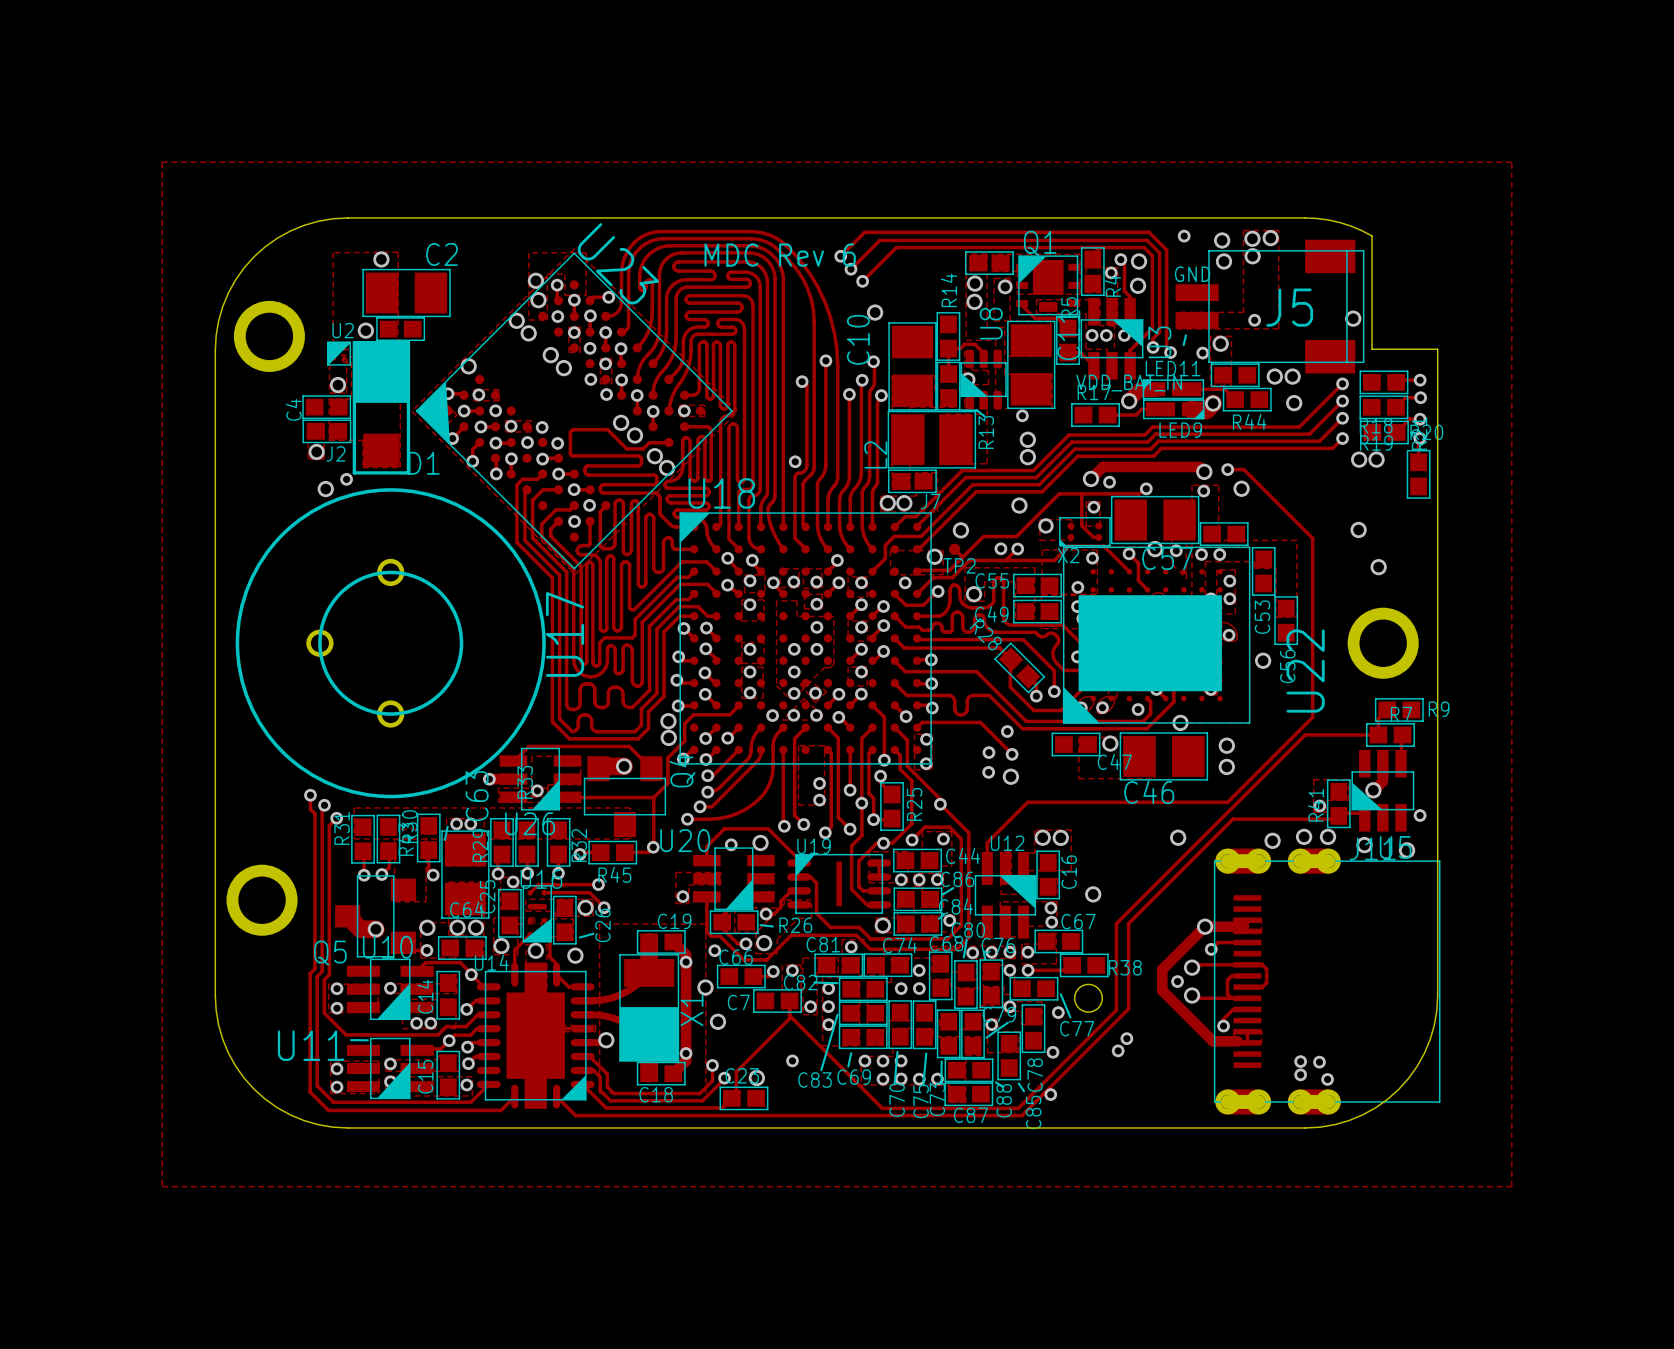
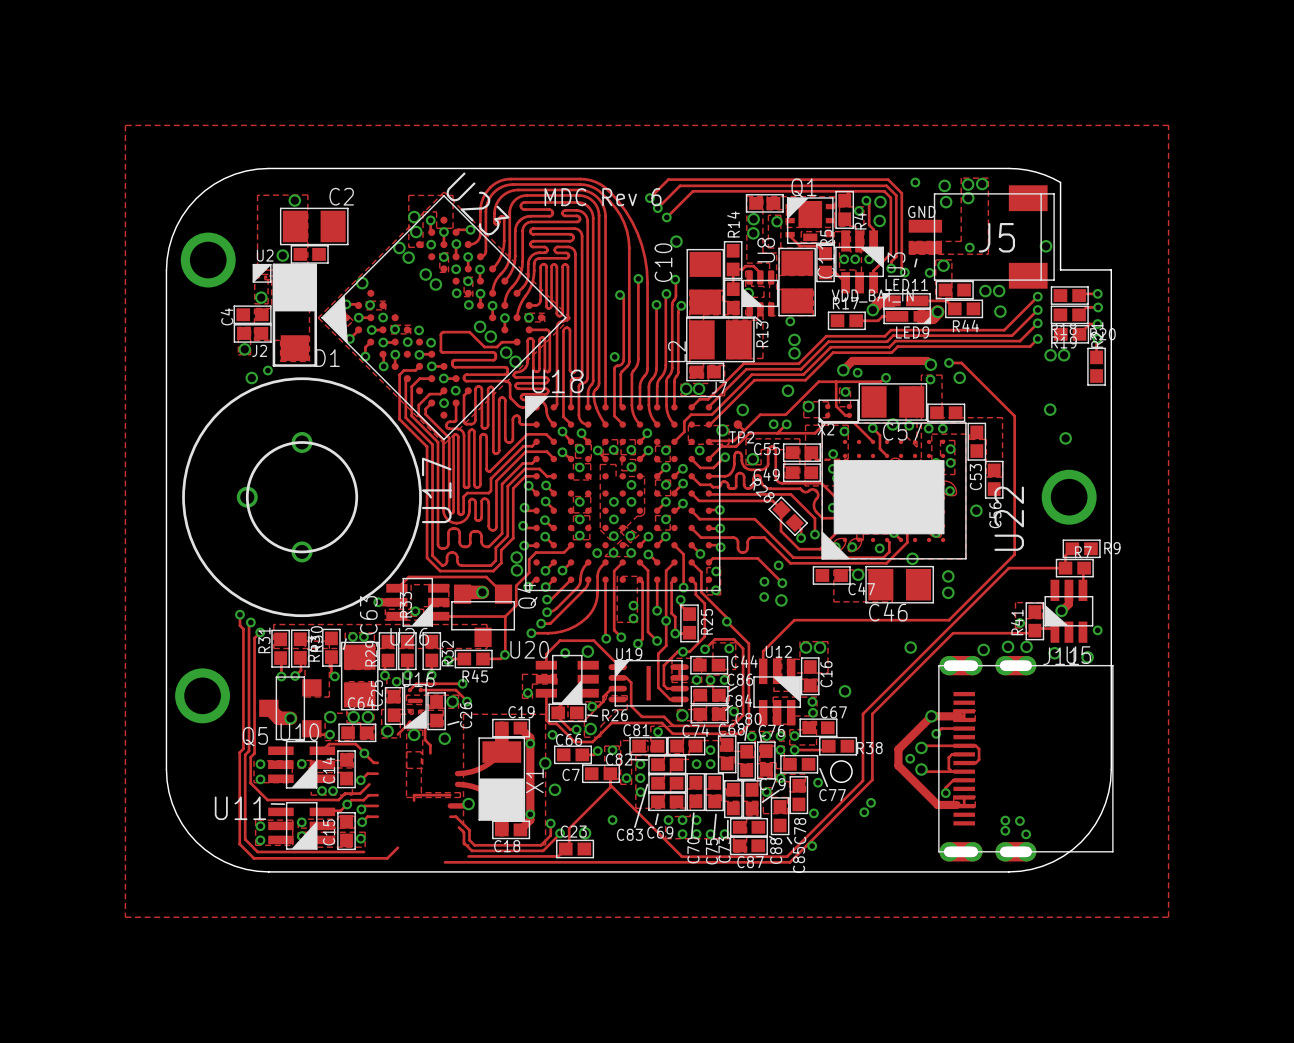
track: (514, 950) (514, 974) -> none
track: (556, 974) (568, 986) (582, 986) -> none
U14: (535, 1035) -> none
track: (488, 1084) (470, 1102) -> none
track: (582, 1084) (606, 1107) -> none
track: (556, 1096) (575, 1115) -> none

